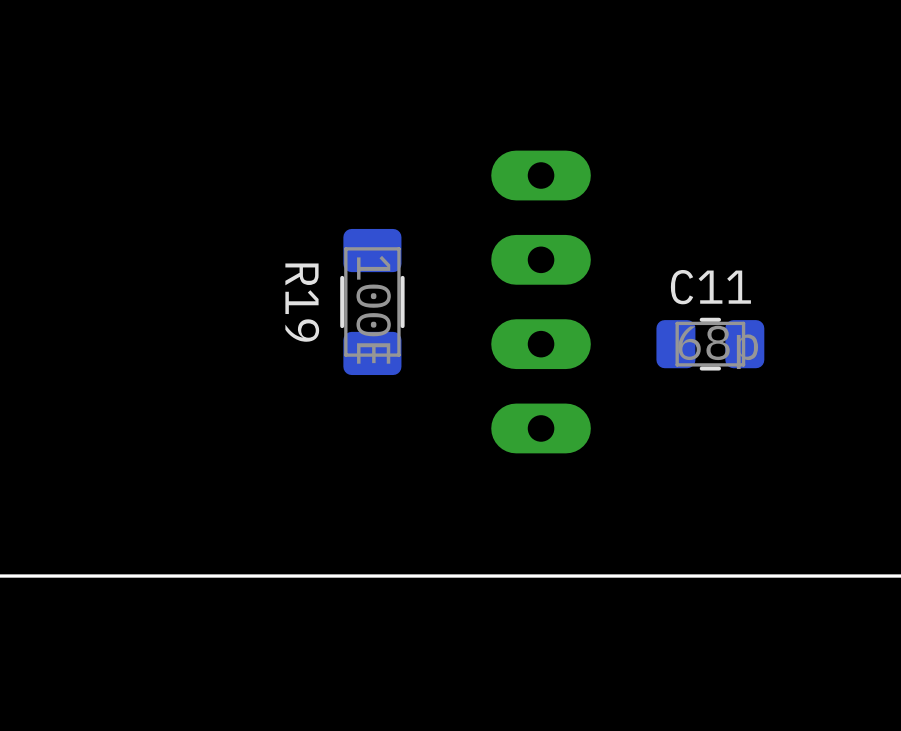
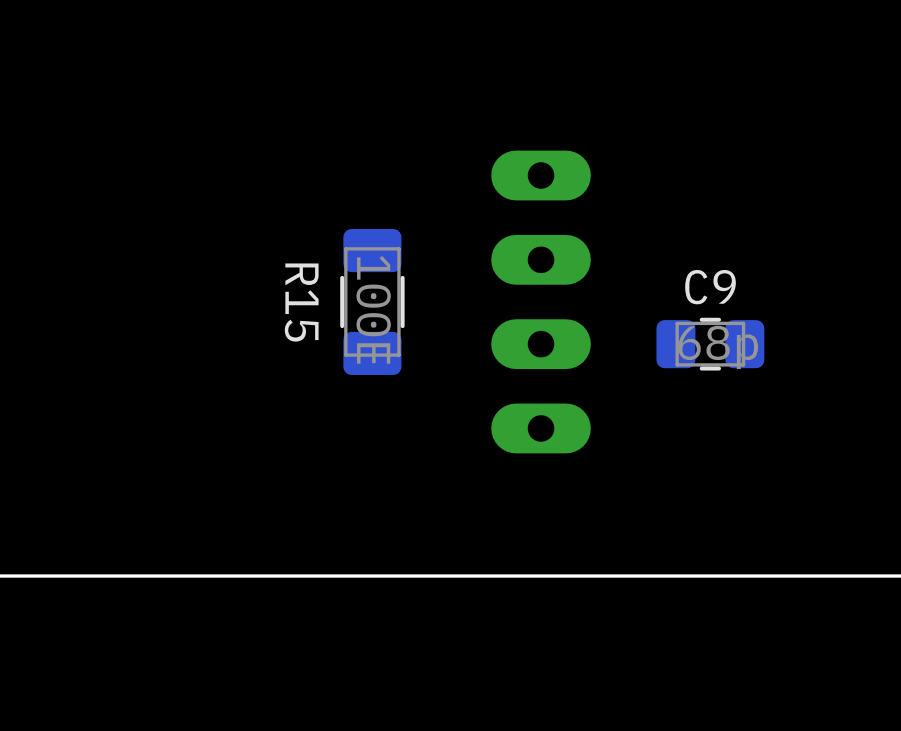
C11 name: C11 (710, 287) -> C9 (710, 287)
R19 name: R19 (302, 302) -> R15 (301, 302)

